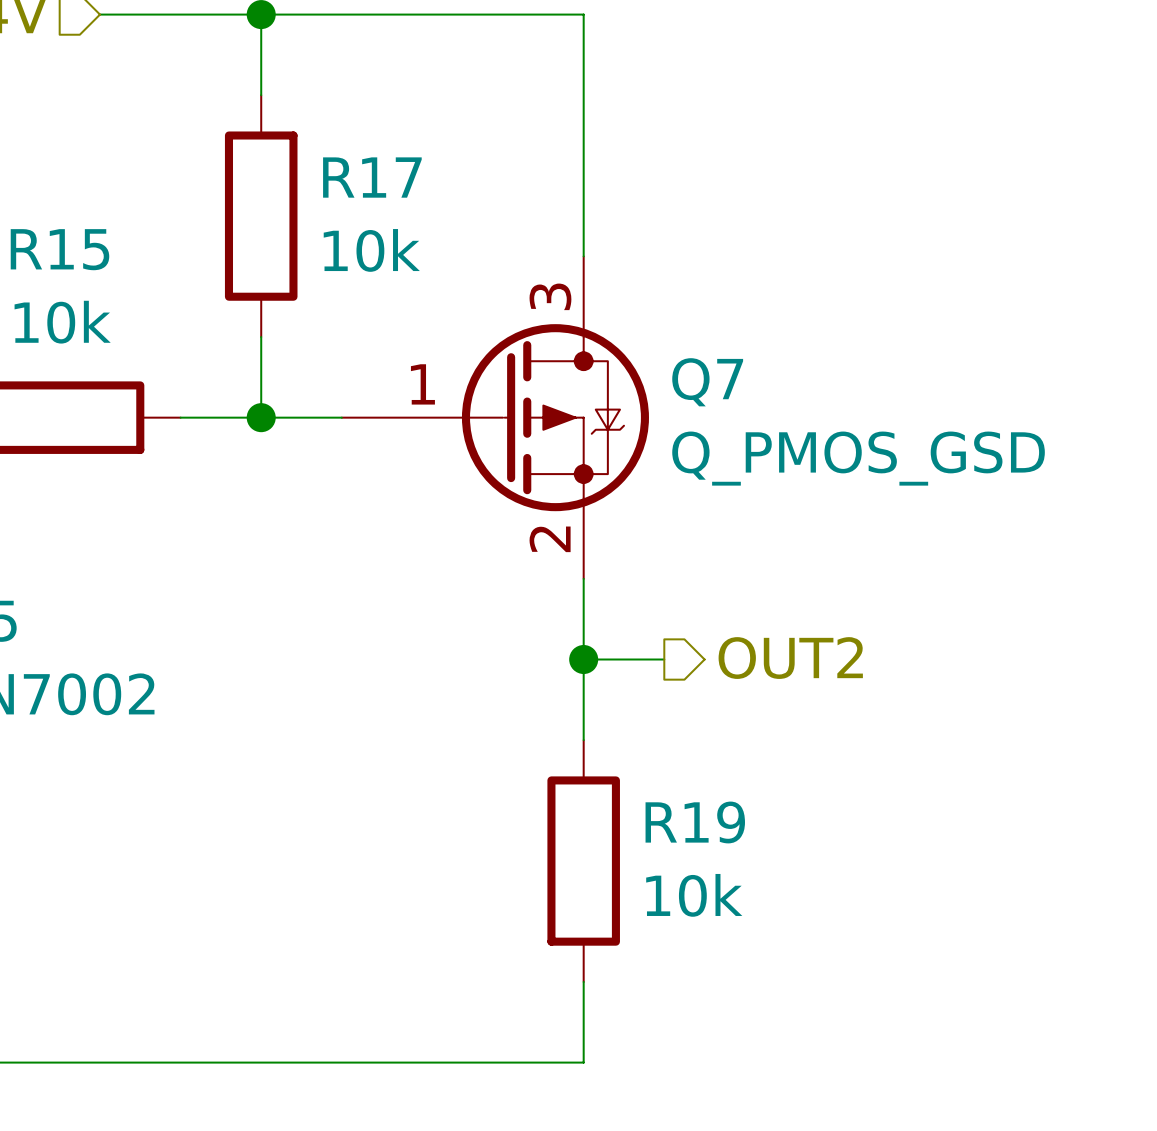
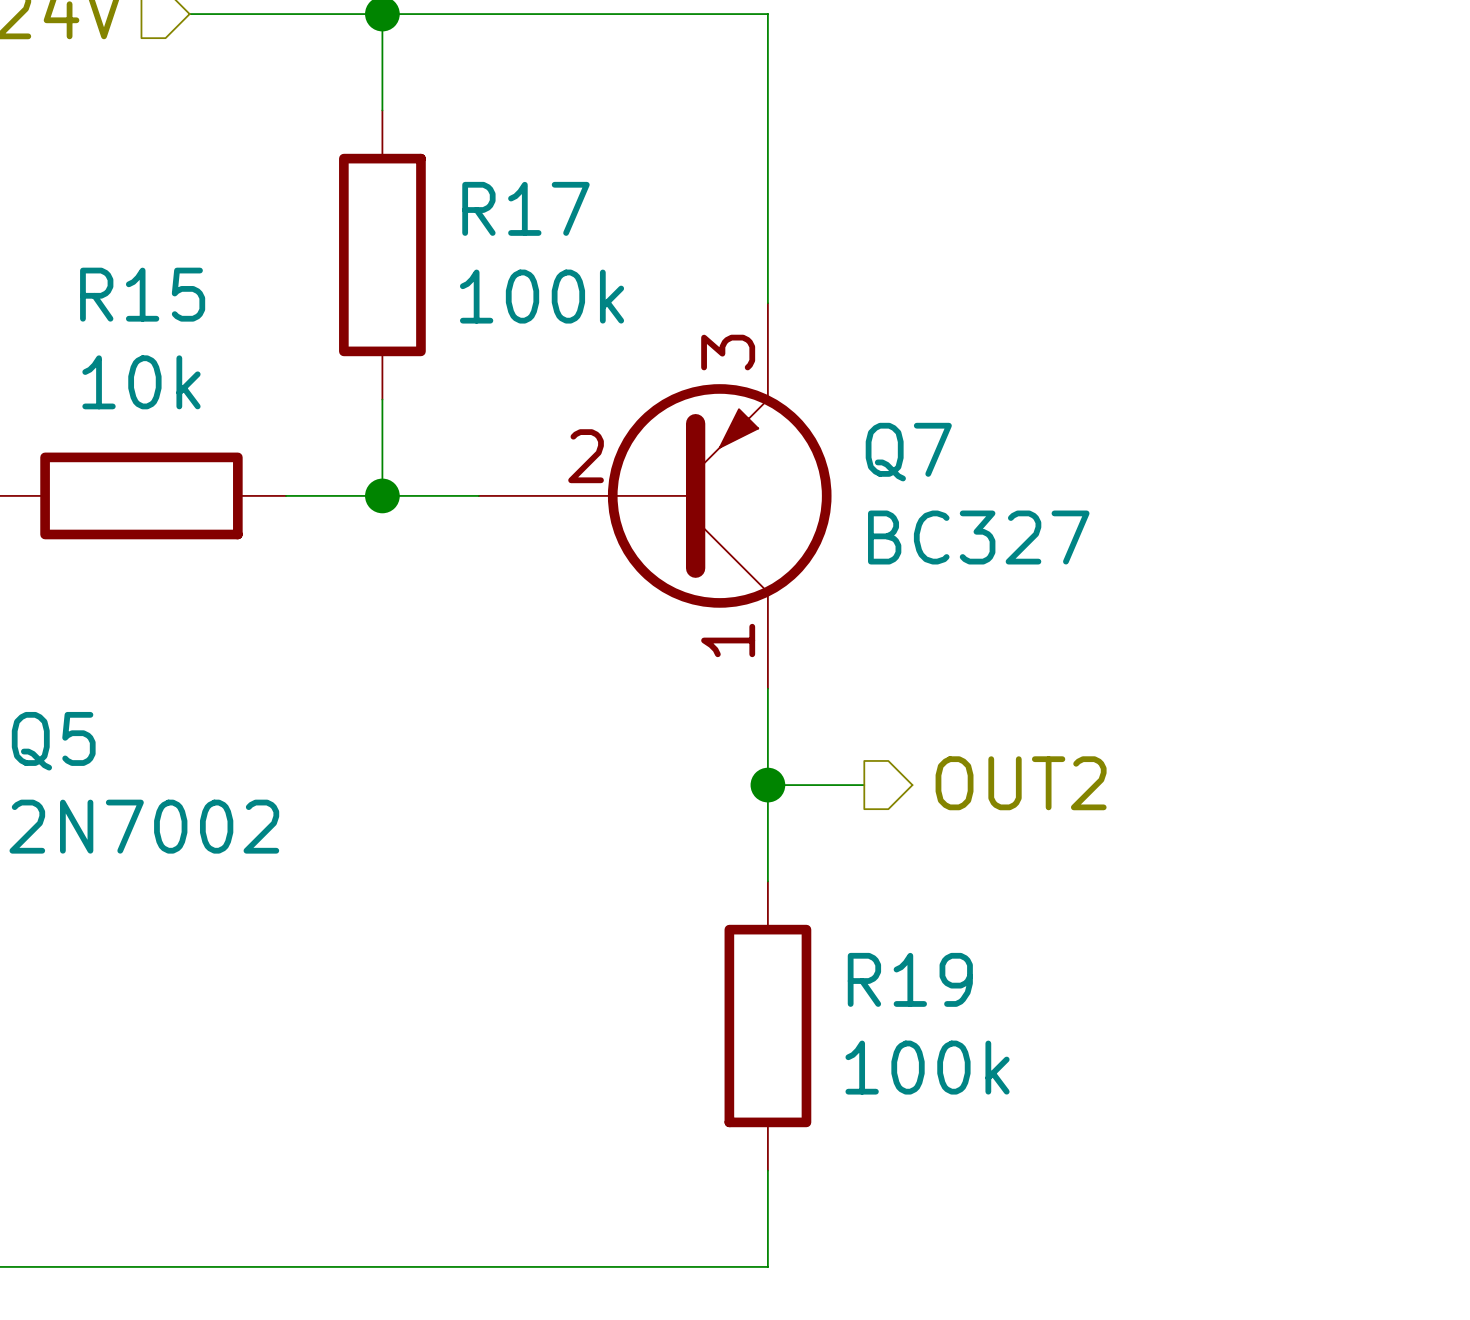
R17 value: 10k (371, 250) -> 100k (542, 296)
Q7 symbol: [341, 256, 649, 579] -> [478, 303, 832, 689]
Q7 value: Q_PMOS_GSD (858, 458) -> BC327 (978, 537)
R19 value: 10k (694, 895) -> 100k (927, 1067)

